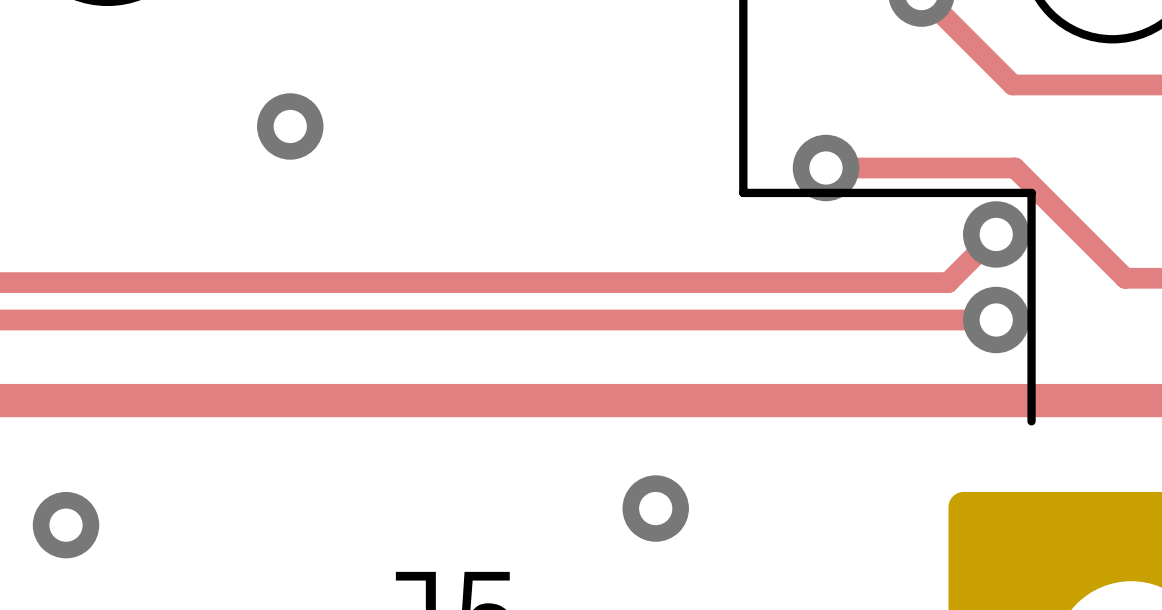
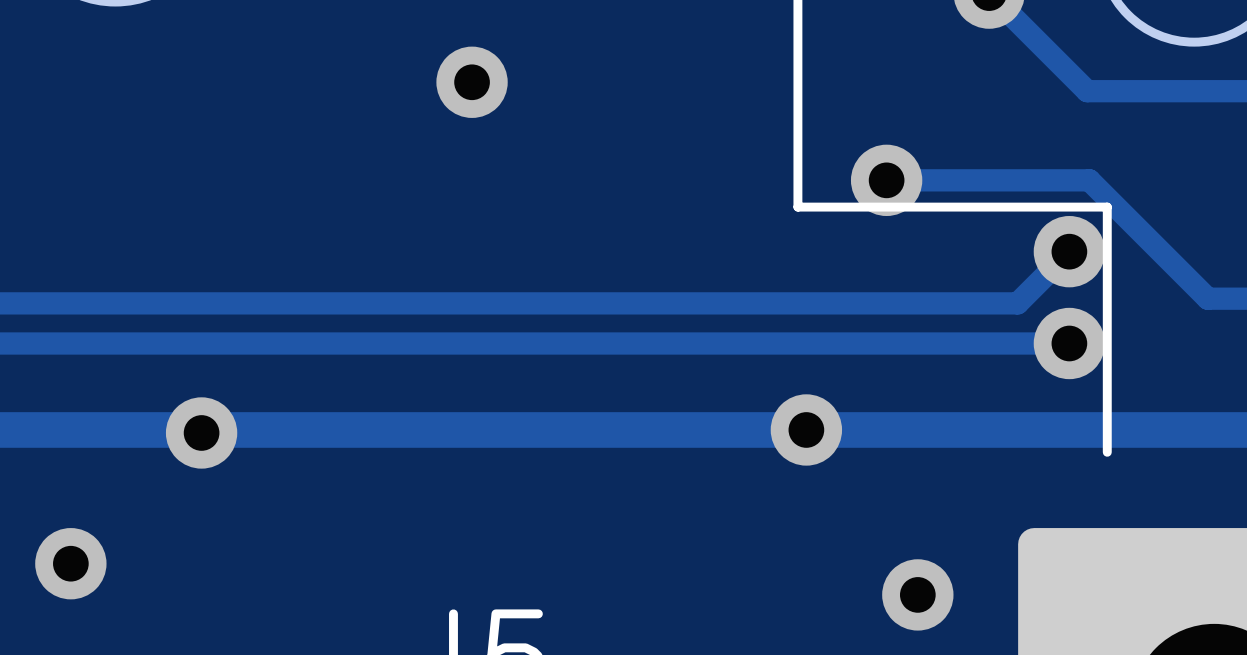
via: none -> (472, 82)
via: (290, 126) -> none
via: none -> (806, 429)
via: none -> (201, 432)
via: (655, 508) -> none
via: none -> (917, 594)

